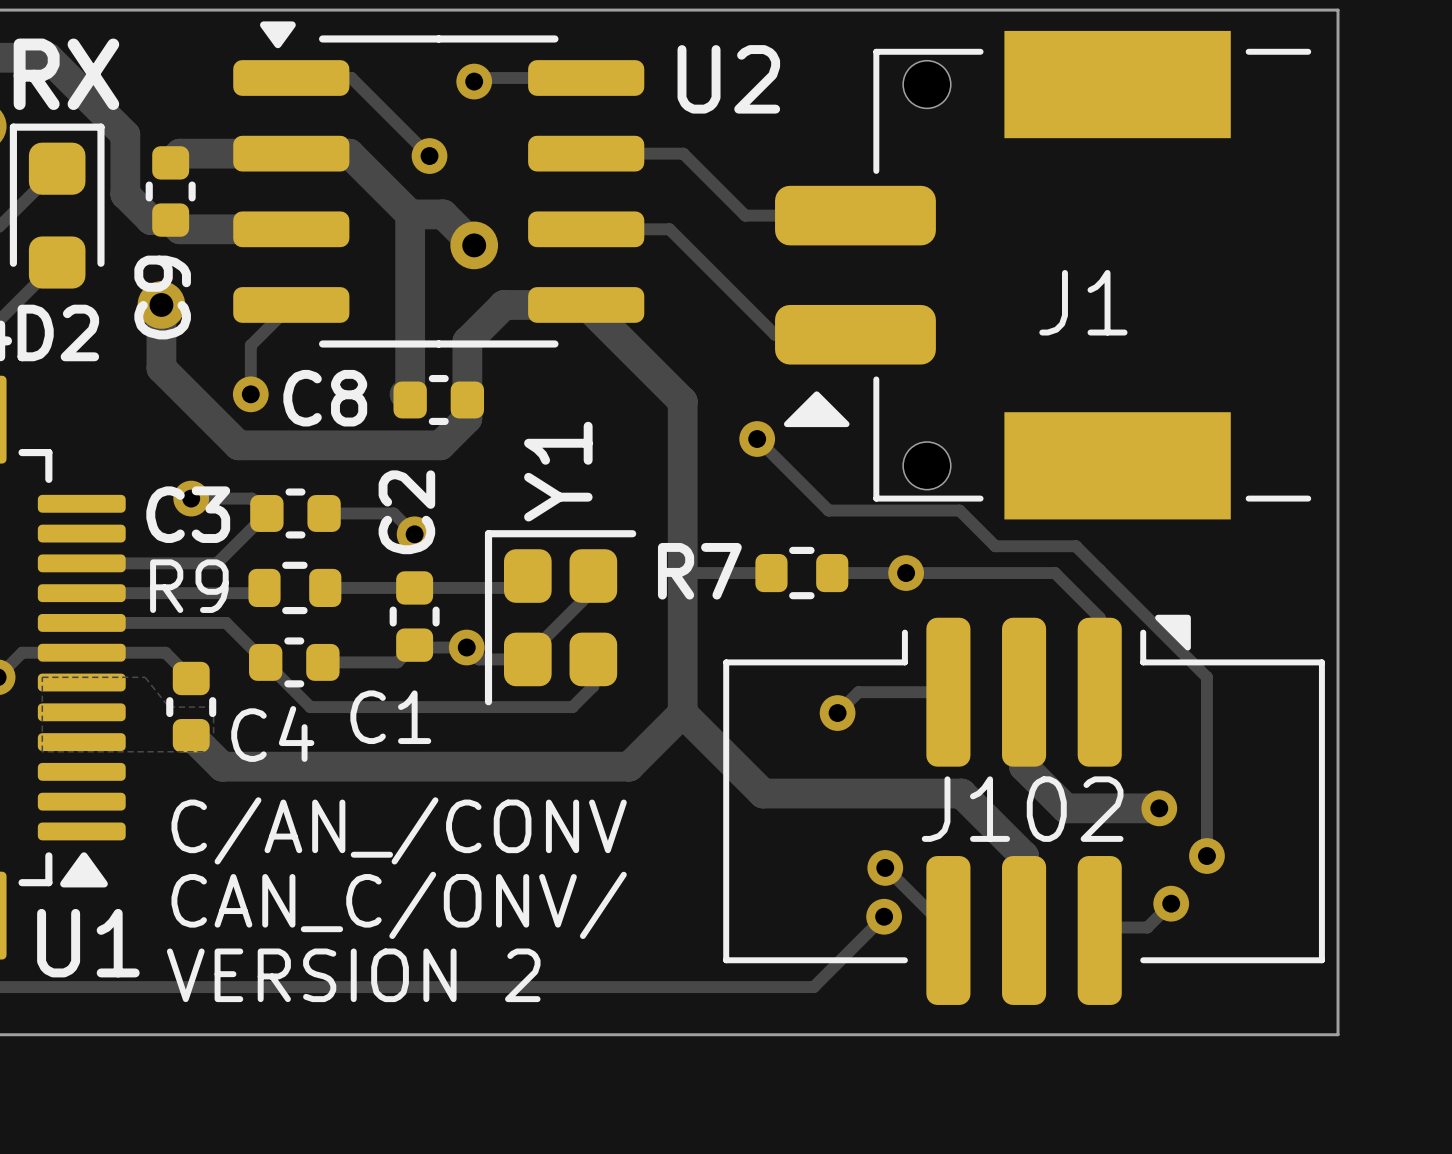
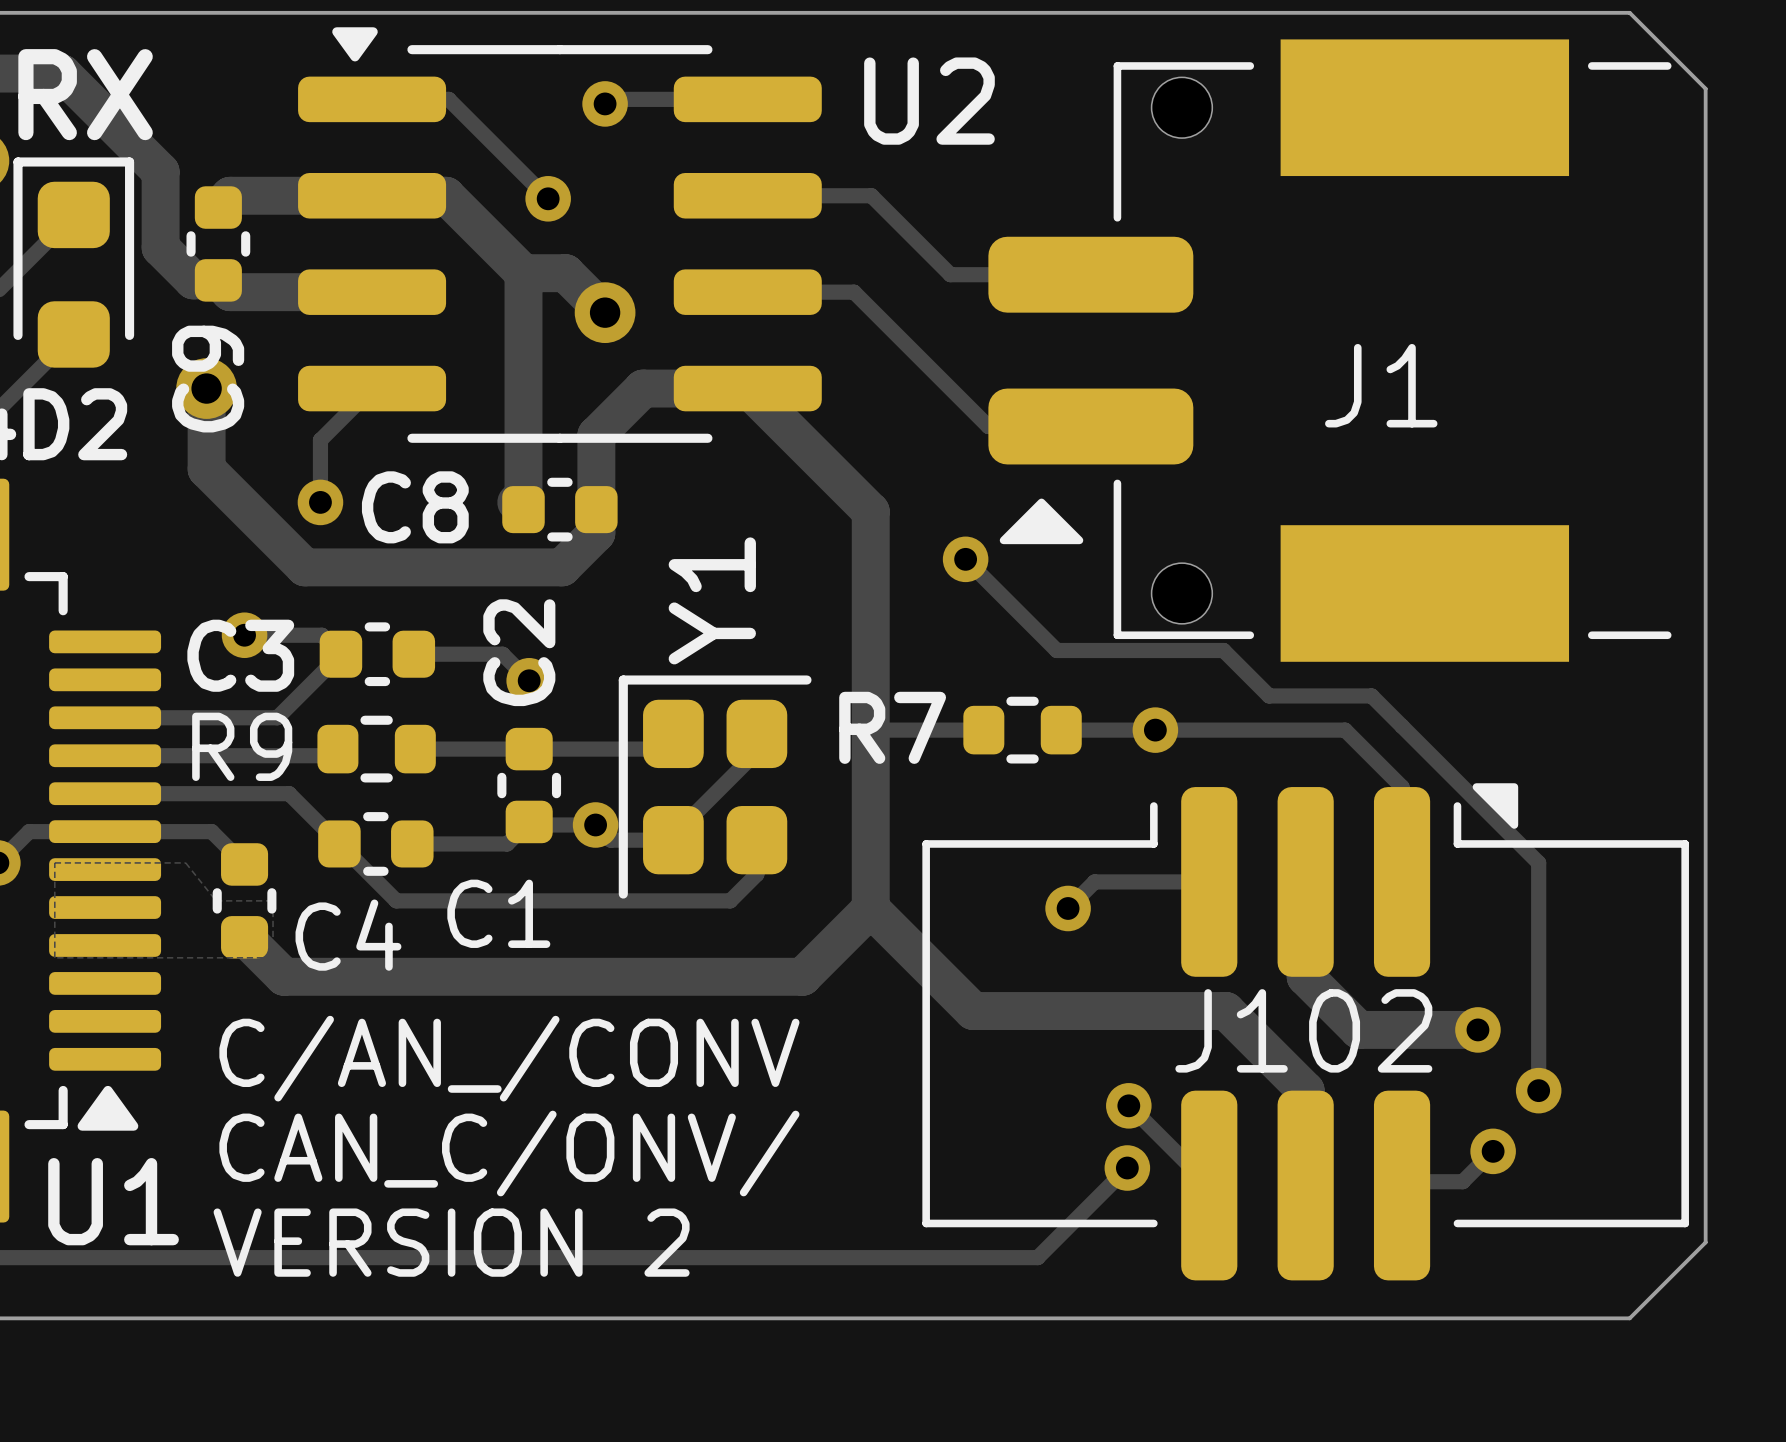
board edge: (1278, 10) (1338, 10) (1338, 69) -> (1629, 12) (1705, 88)
board edge: (1338, 975) (1338, 1034) (1278, 1034) -> (1705, 1242) (1629, 1318)

